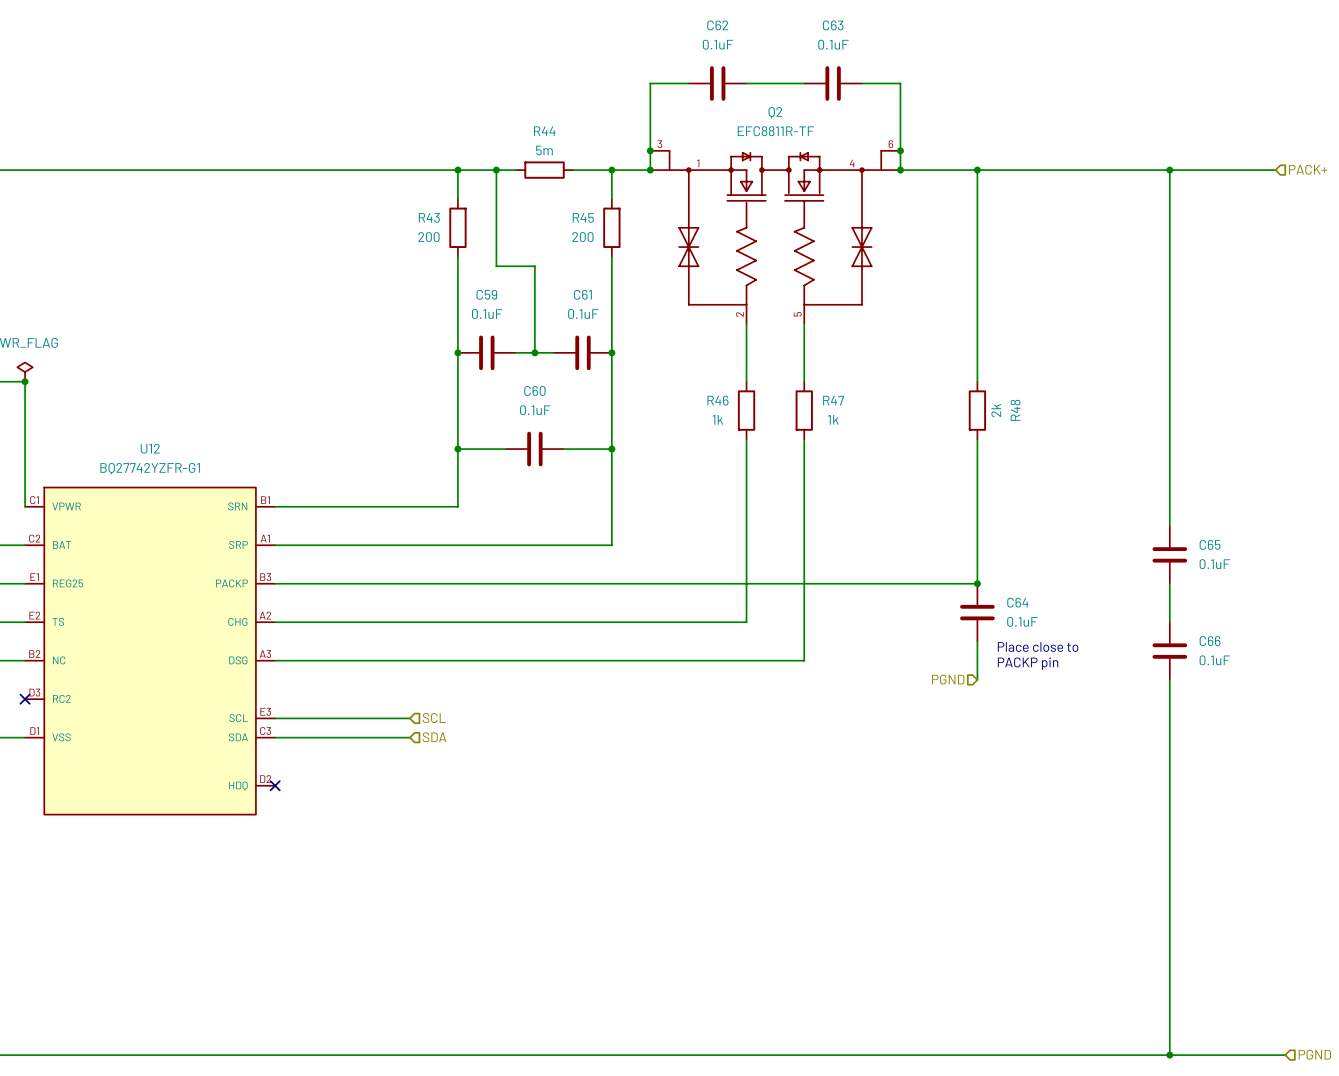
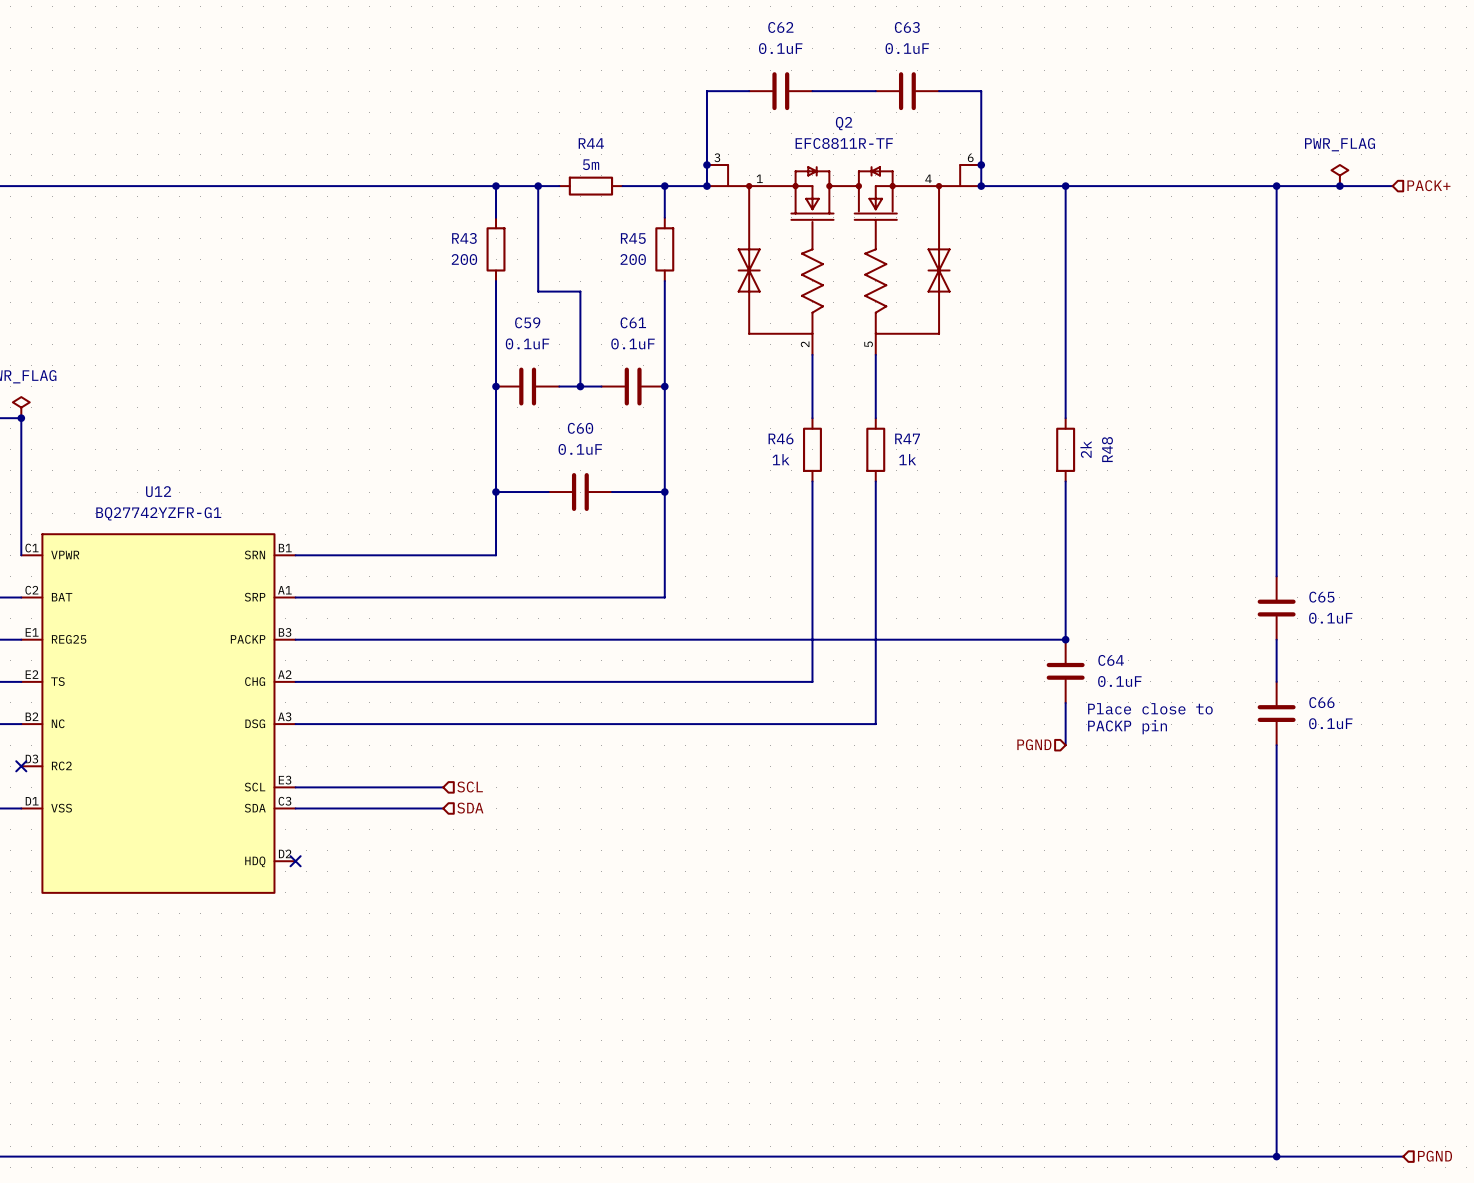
power symbol: none -> PWR_FLAG (1339, 175)
junction: none -> (1339, 186)

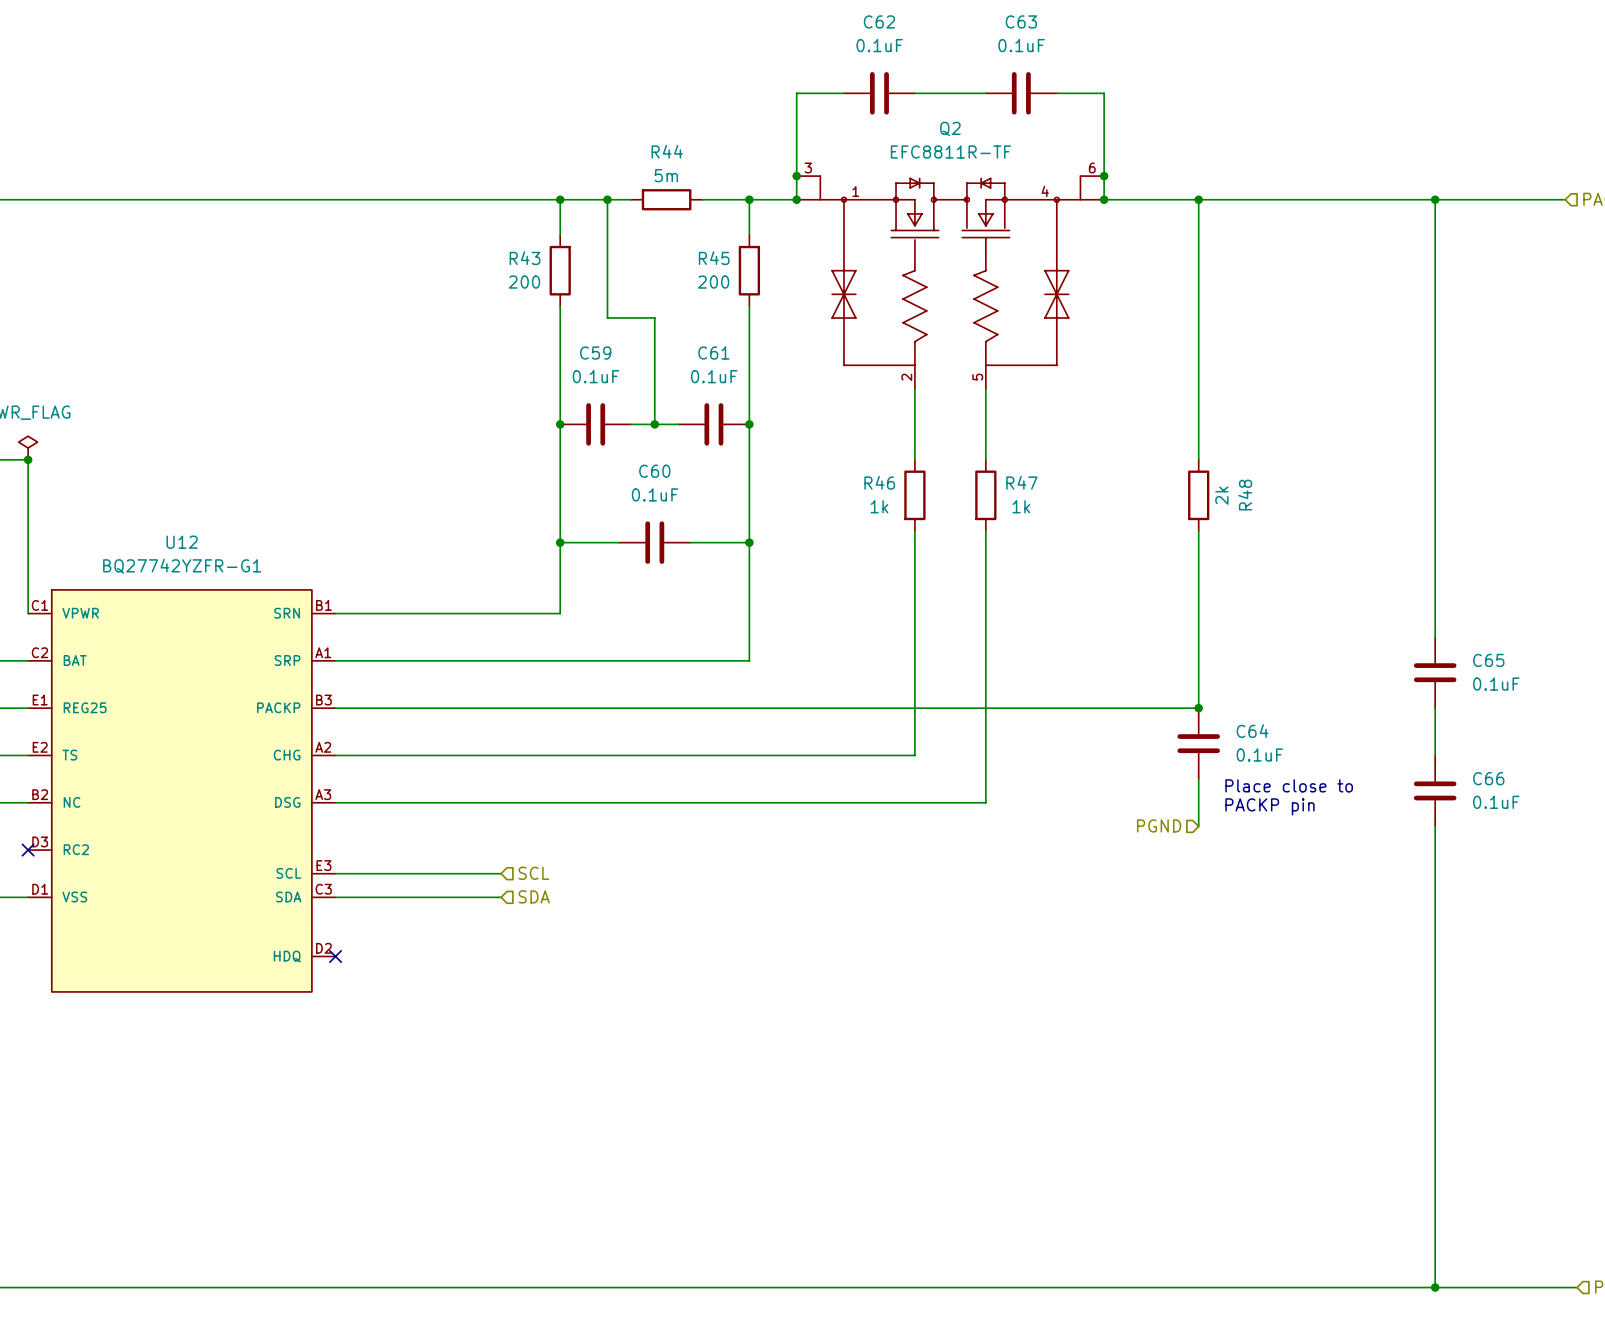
power symbol: PWR_FLAG (1339, 175) -> none
junction: (1339, 186) -> none

